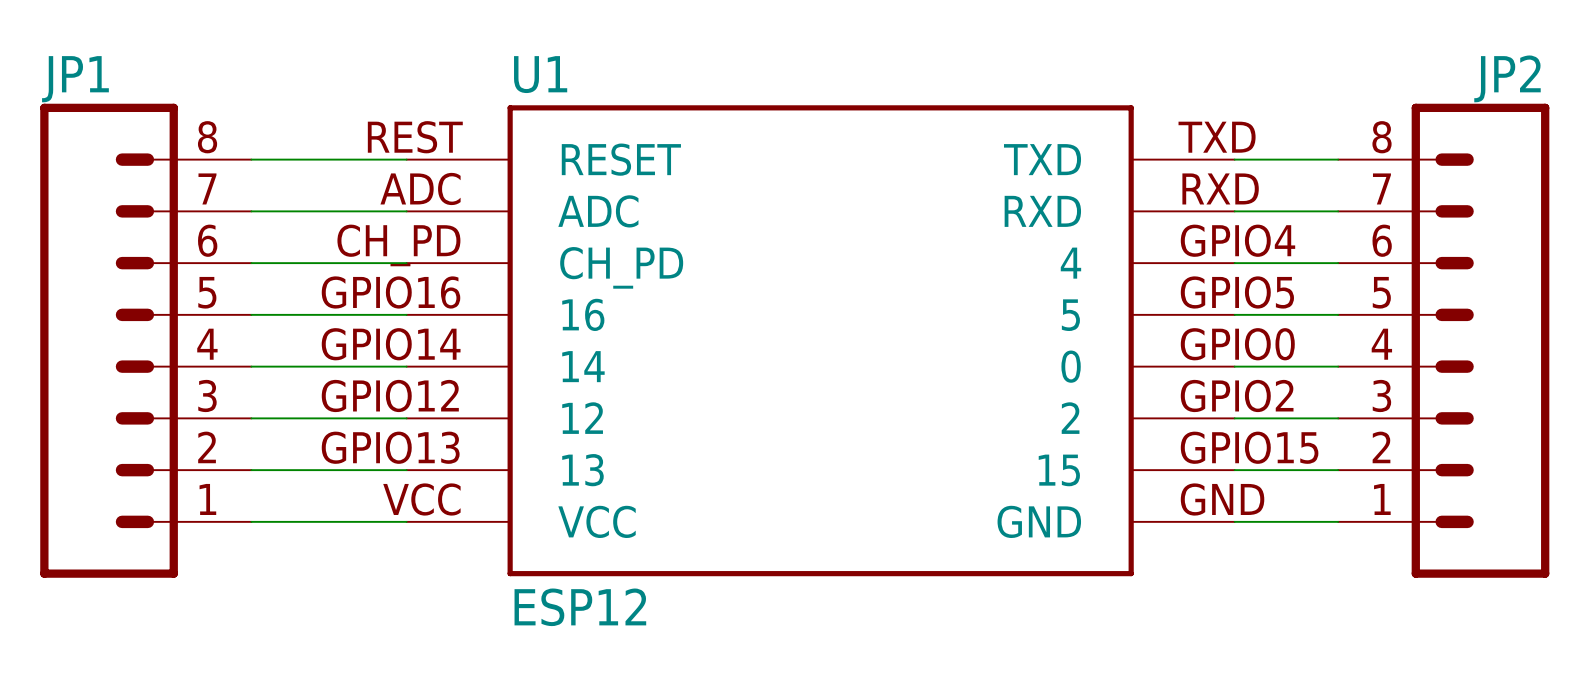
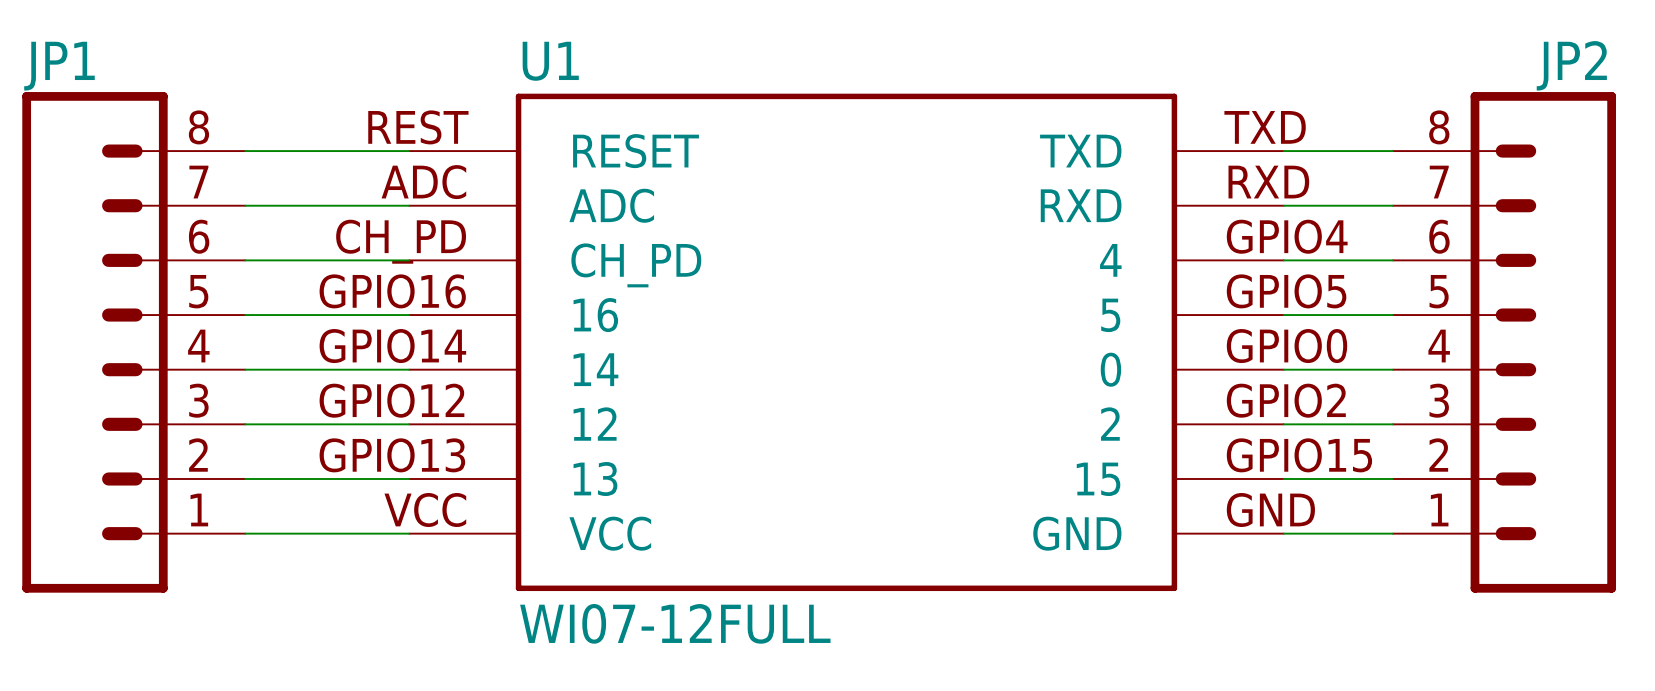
U1 value: ESP12 (580, 607) -> WI07-12FULL (675, 623)

